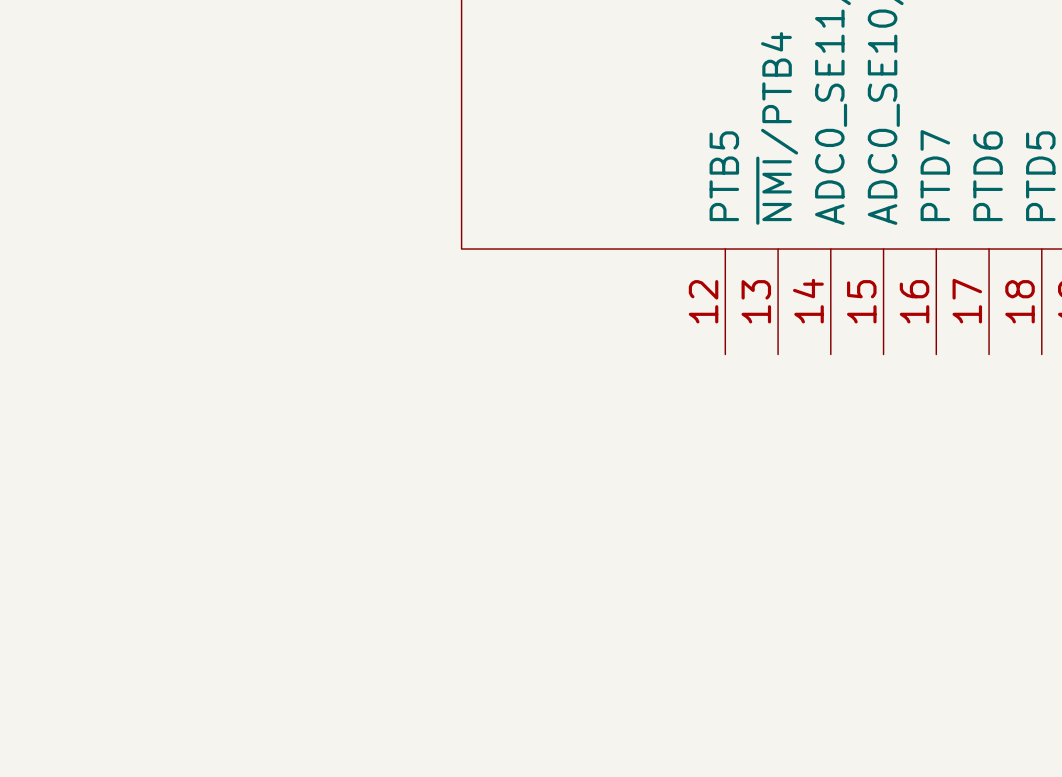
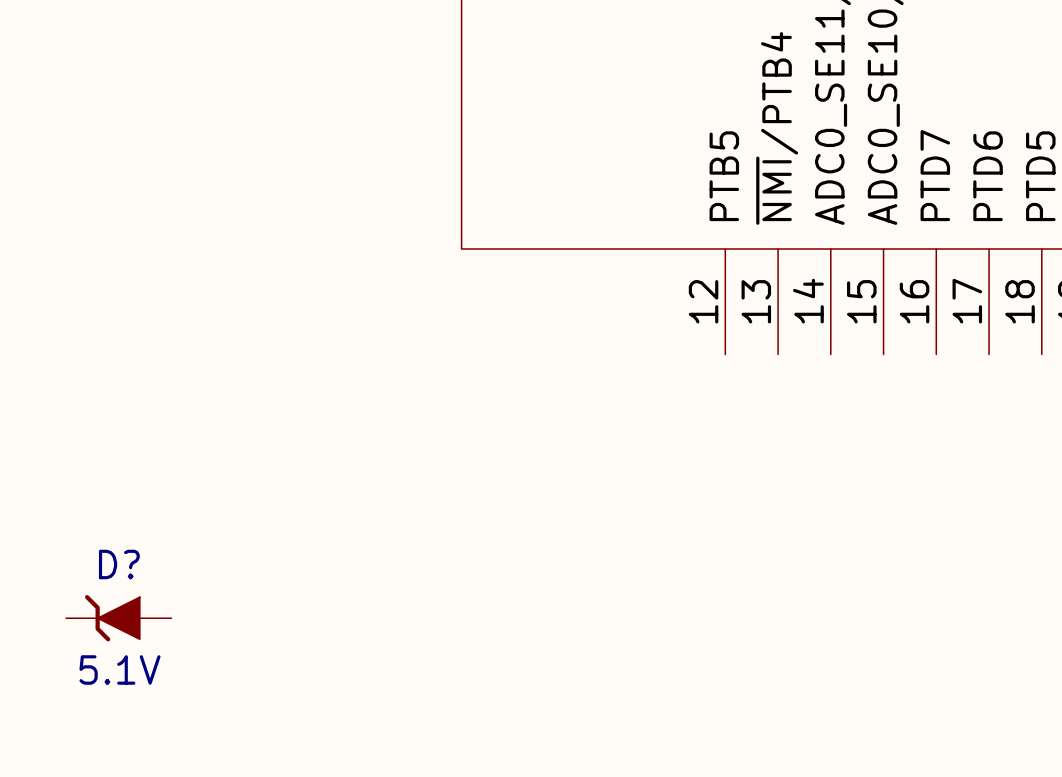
D?: none -> 5.1V (118, 618)

